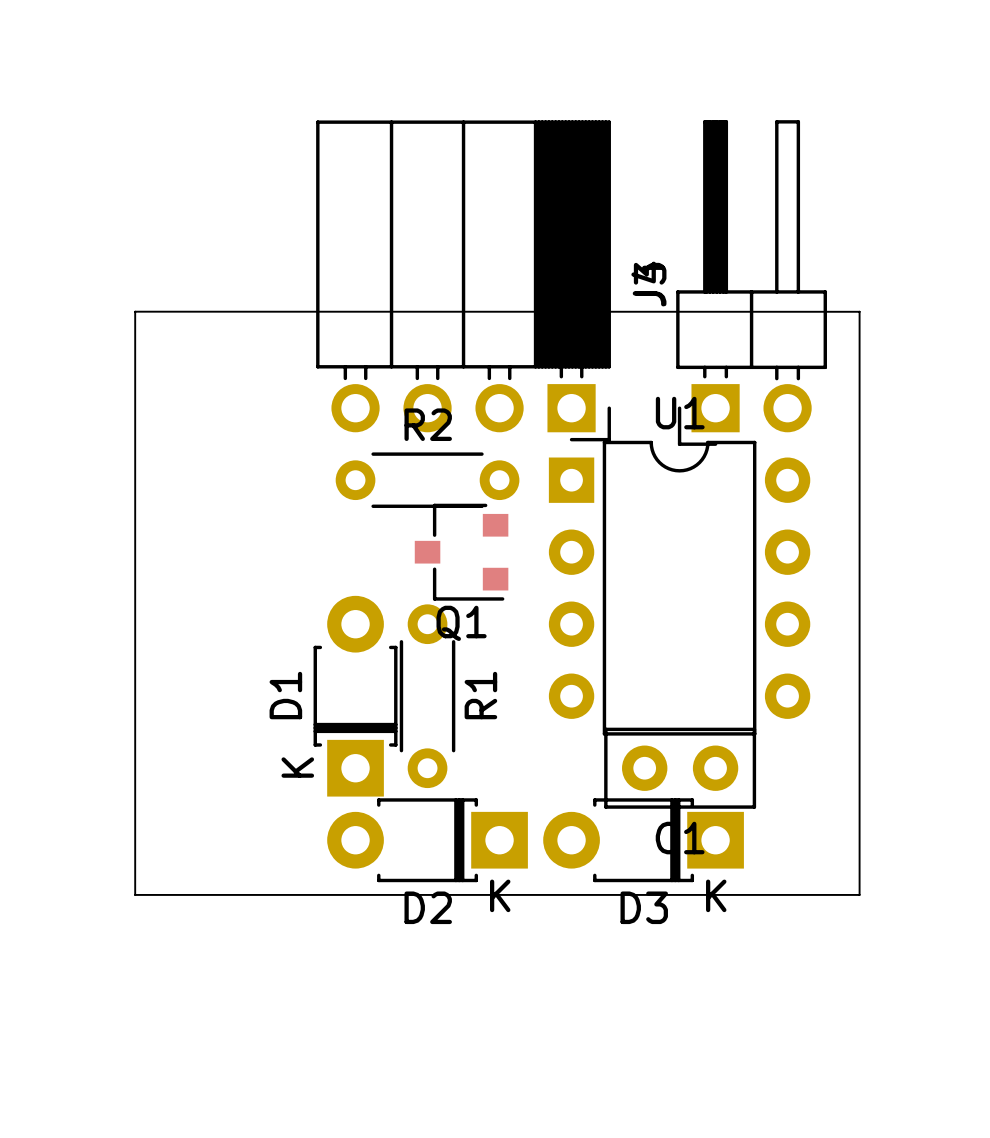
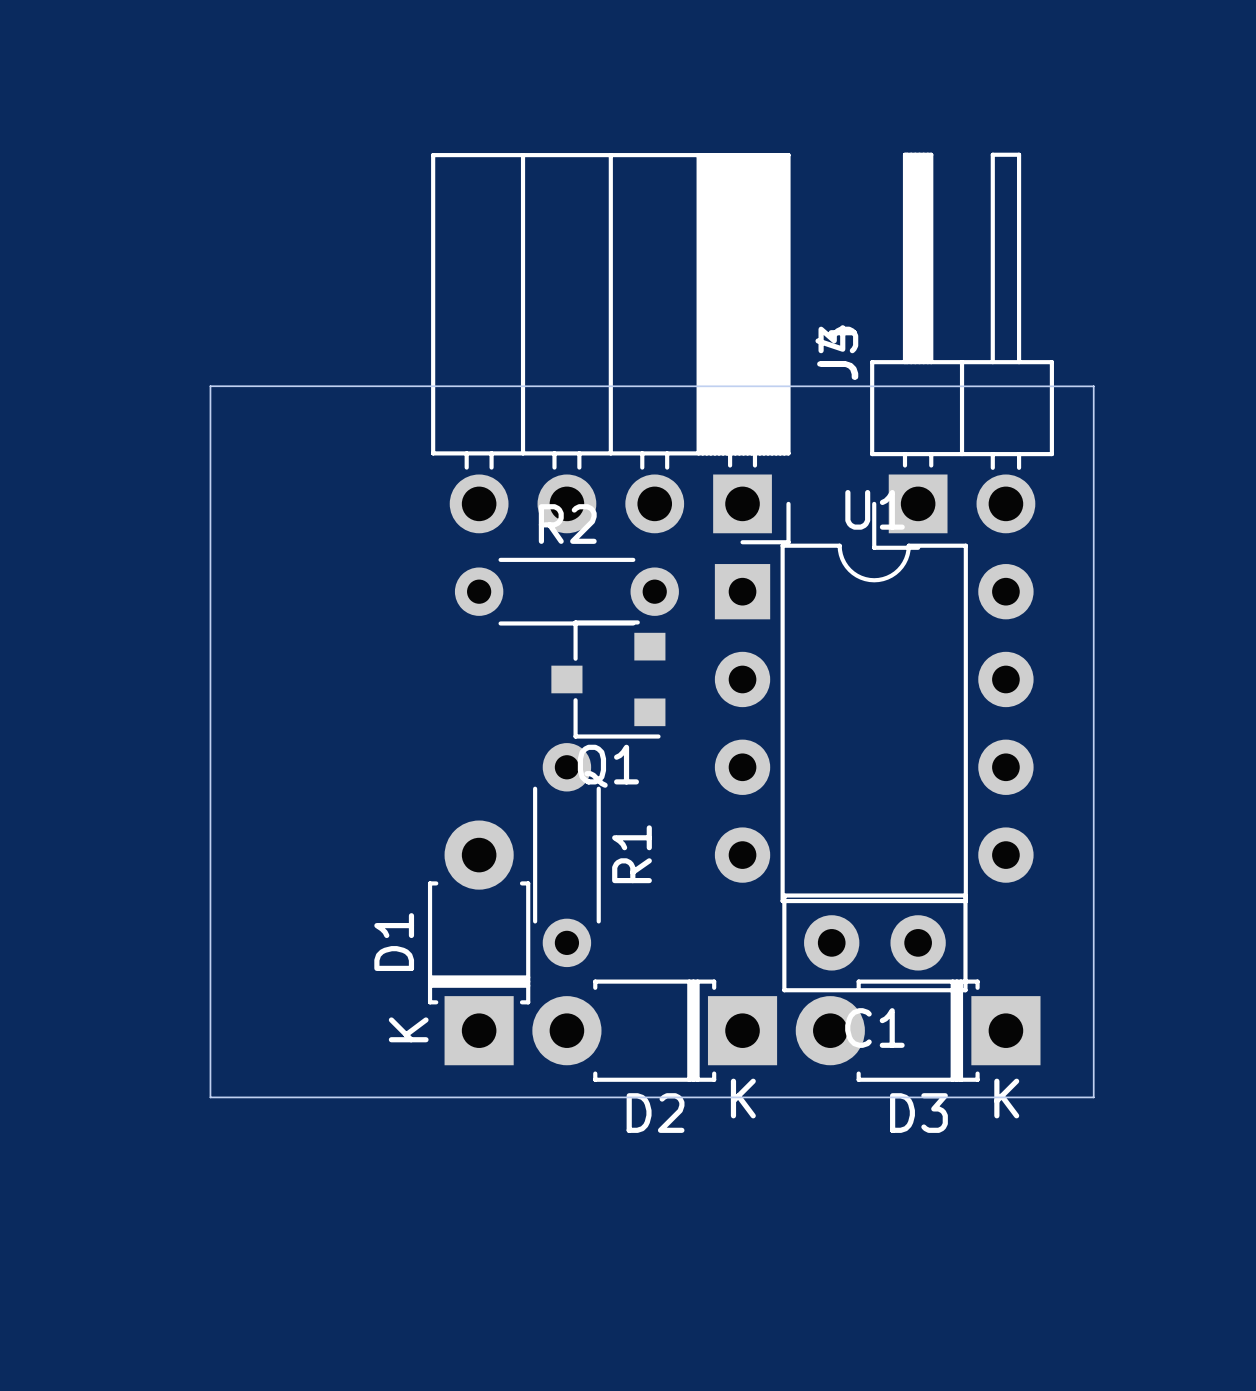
D1 position: (355, 696) -> (479, 942)
D2 position: (427, 840) -> (654, 1030)
D3 position: (643, 840) -> (918, 1030)

